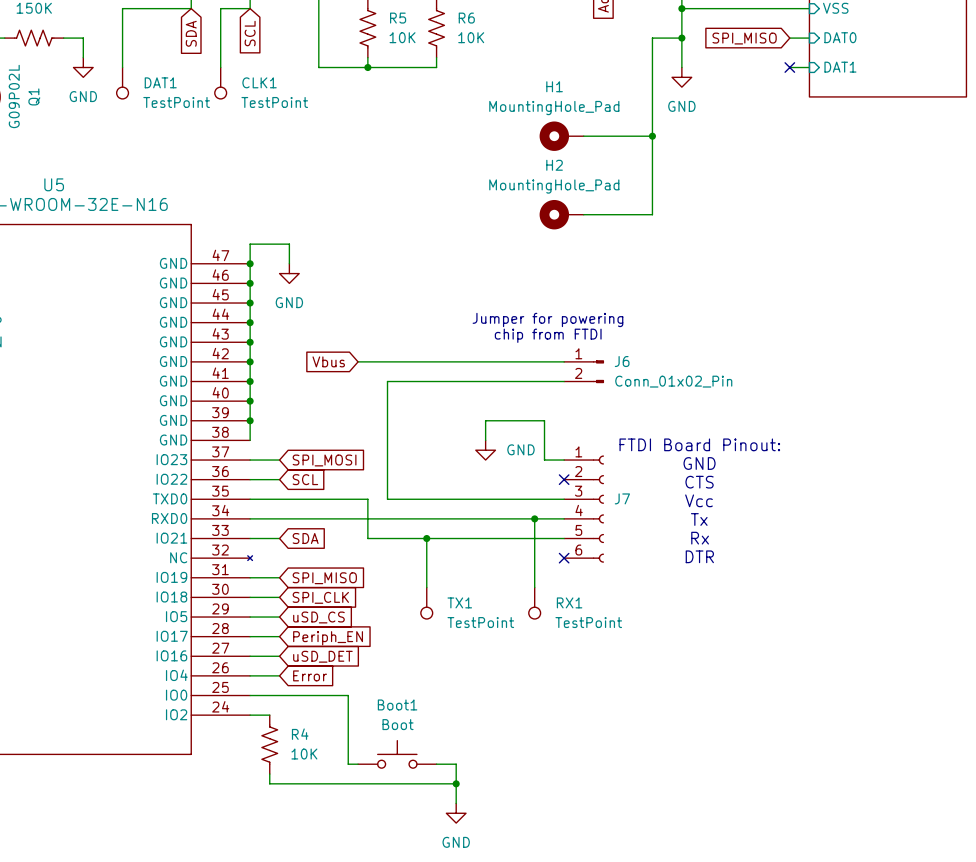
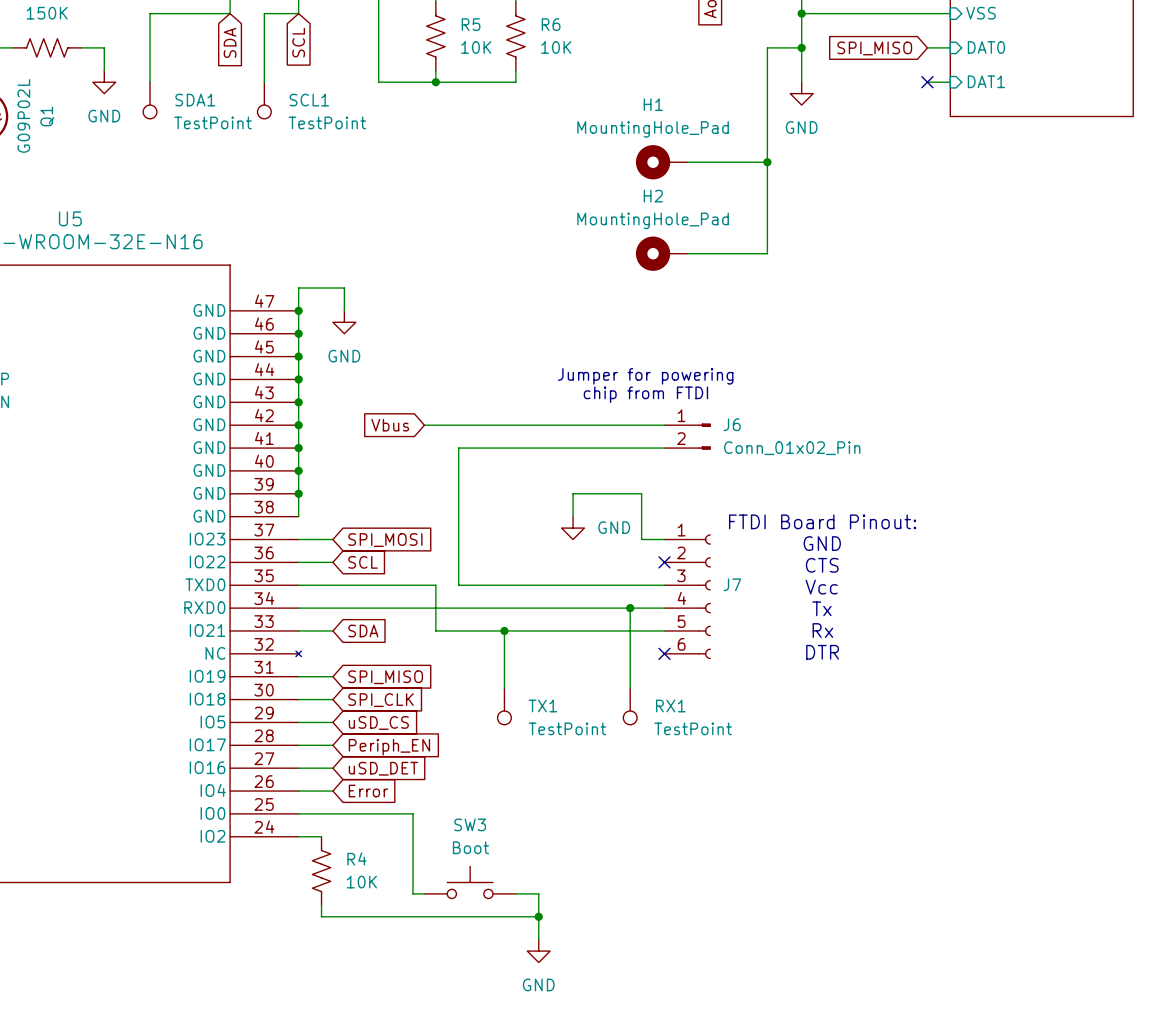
DAT1 name: DAT1 (160, 82) -> SDA1 (195, 100)
CLK1 name: CLK1 (259, 82) -> SCL1 (309, 100)
Boot1 name: Boot1 (397, 704) -> SW3 (470, 824)

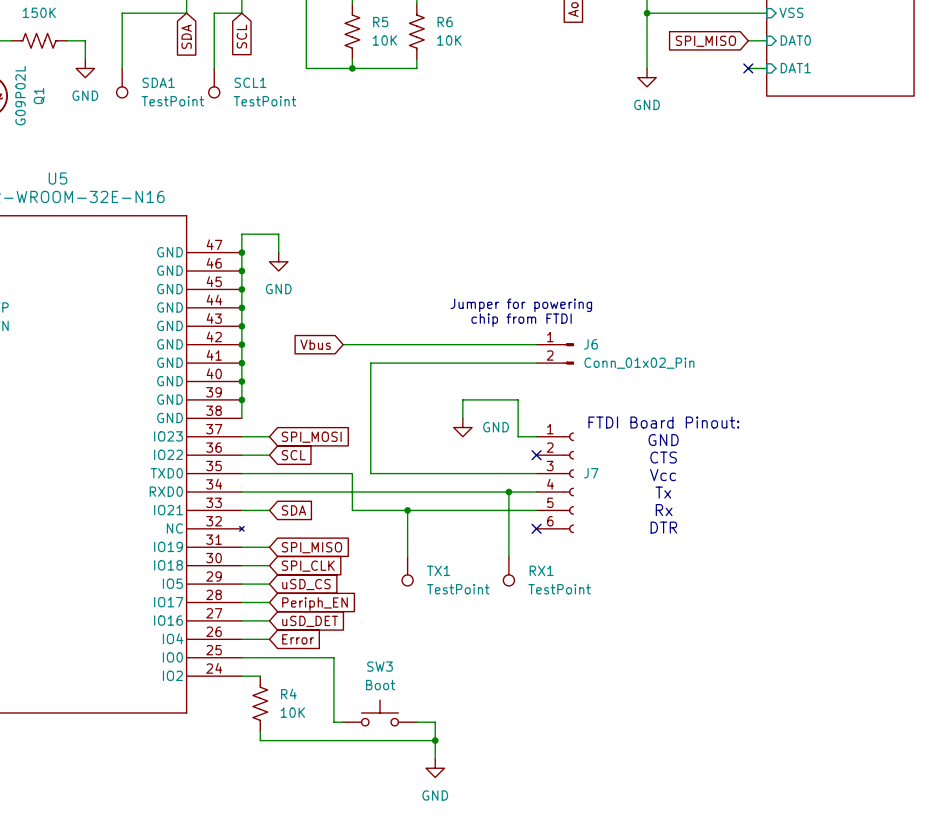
wire: (801, 47) (767, 47) (767, 253) (687, 253) -> none
junction: (801, 47) -> none
H1: MountingHole_Pad (661, 162) -> none
wire: (687, 162) (767, 162) -> none
junction: (767, 162) -> none
H2: MountingHole_Pad (661, 253) -> none

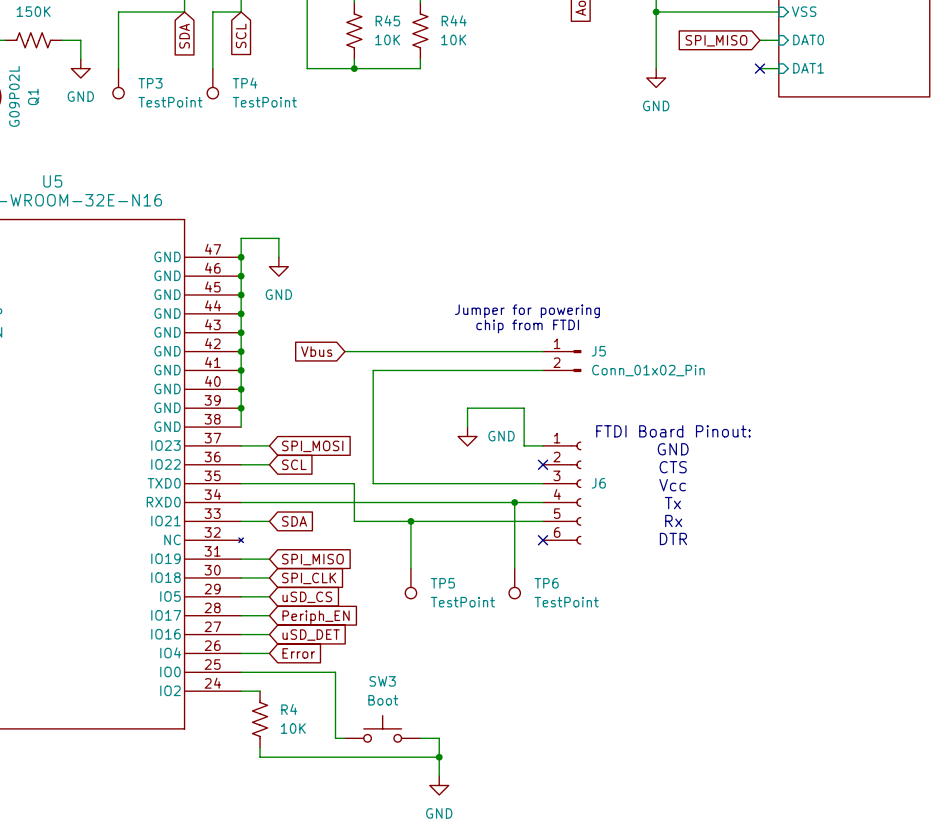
R5 name: R5 (380, 22) -> R45 (387, 20)
R6 name: R6 (445, 22) -> R44 (454, 20)
SDA1 name: SDA1 (158, 82) -> TP3 (150, 83)
SCL1 name: SCL1 (250, 82) -> TP4 (245, 83)
J6 name: J6 (590, 344) -> J5 (598, 351)
J7 name: J7 (591, 473) -> J6 (598, 483)
TX1 name: TX1 (438, 570) -> TP5 (442, 583)
RX1 name: RX1 (541, 570) -> TP6 (546, 583)

